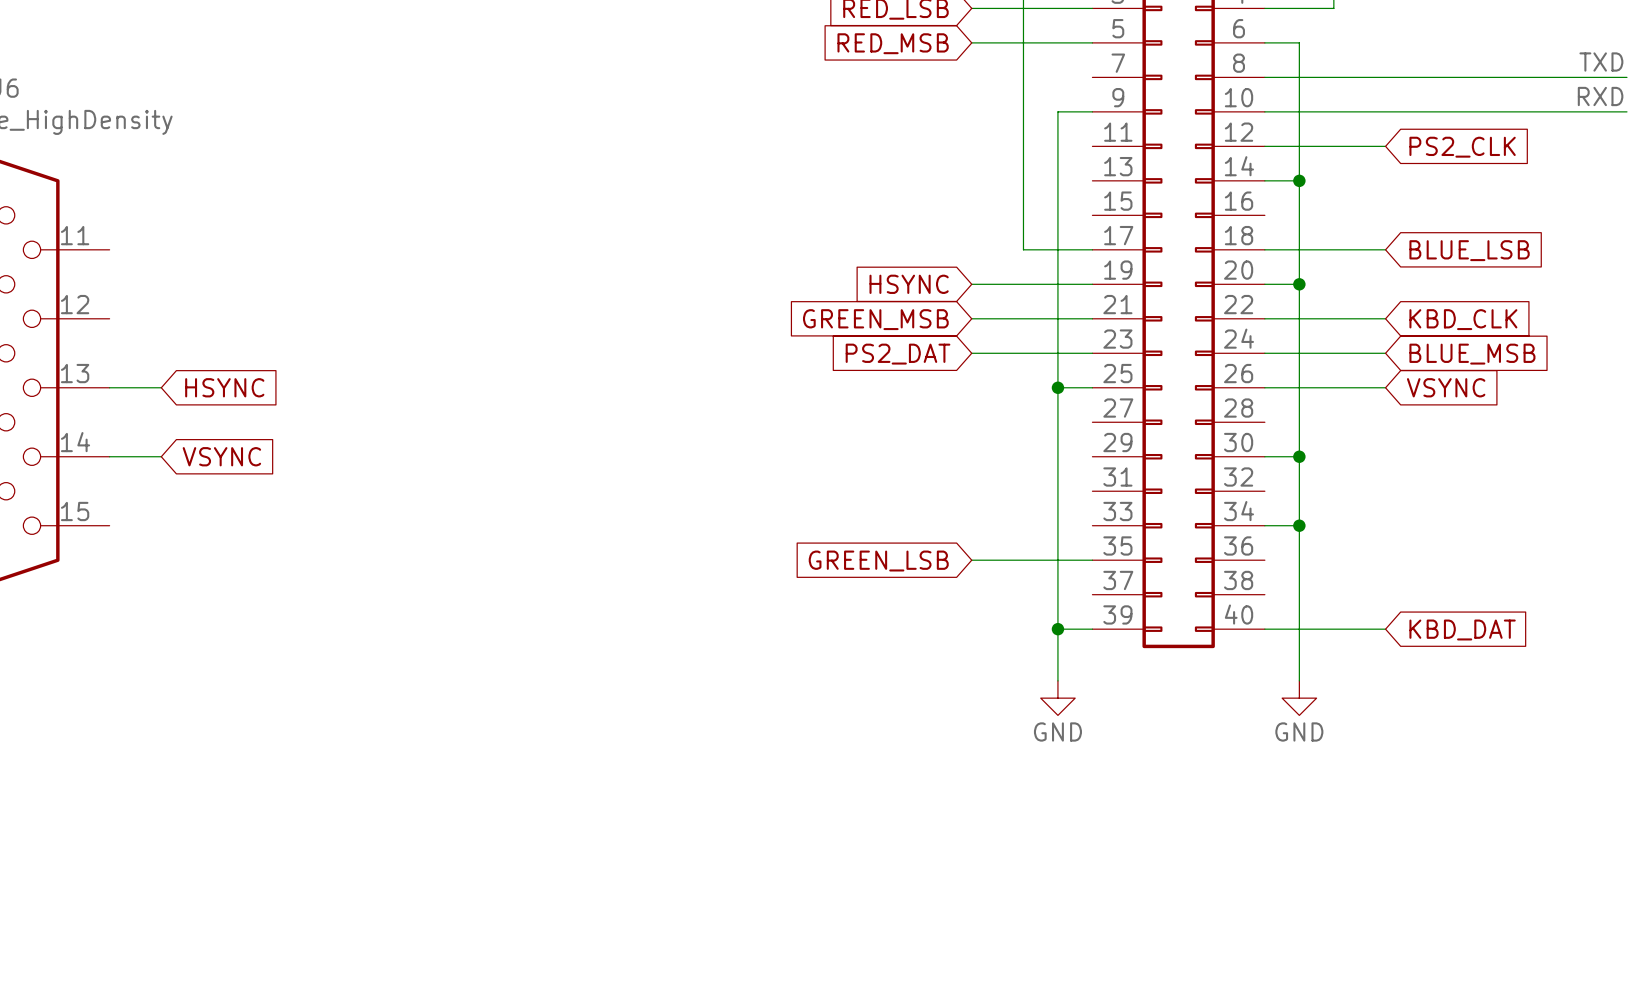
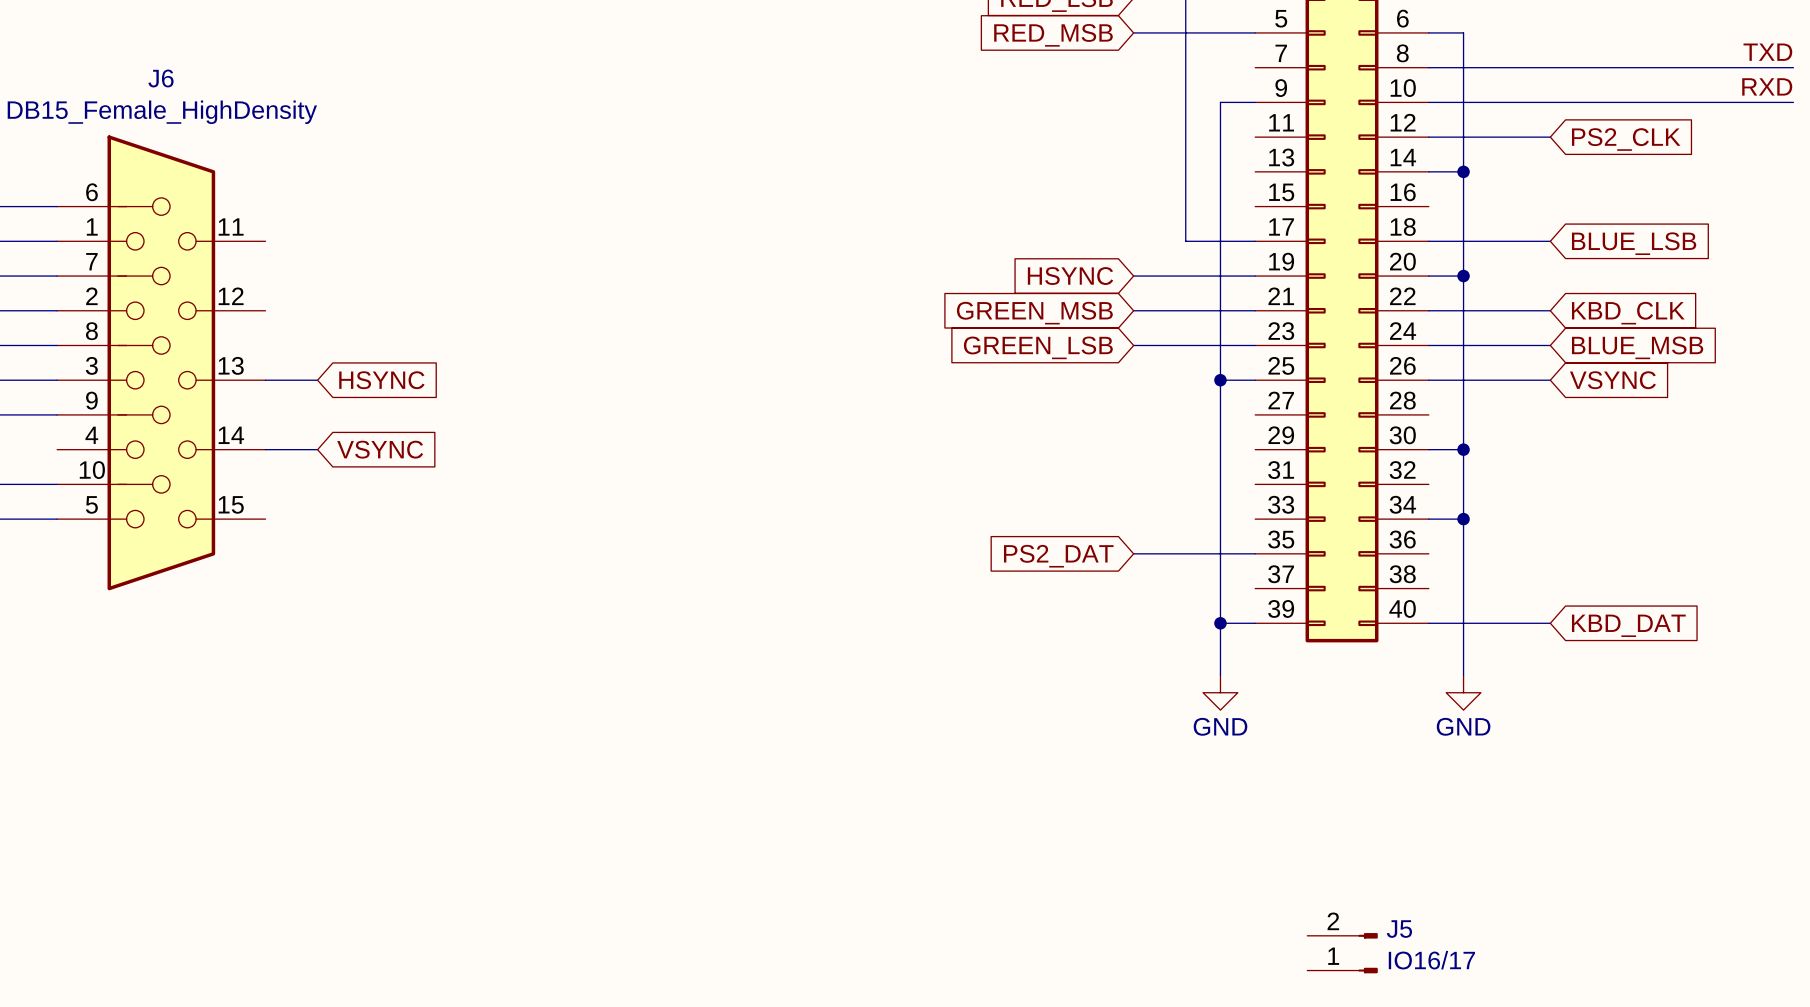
global label: PS2_DAT (898, 354) -> GREEN_LSB (1038, 347)
global label: GREEN_LSB (878, 561) -> PS2_DAT (1058, 556)
J5: none -> IO16/17 (1342, 953)

